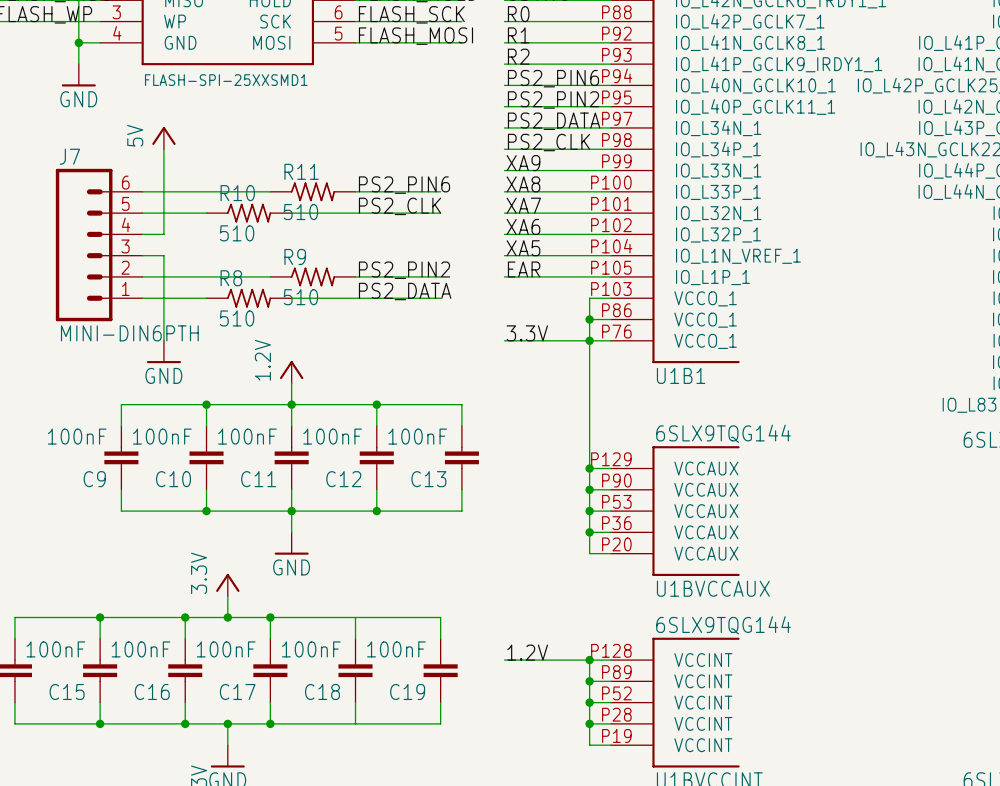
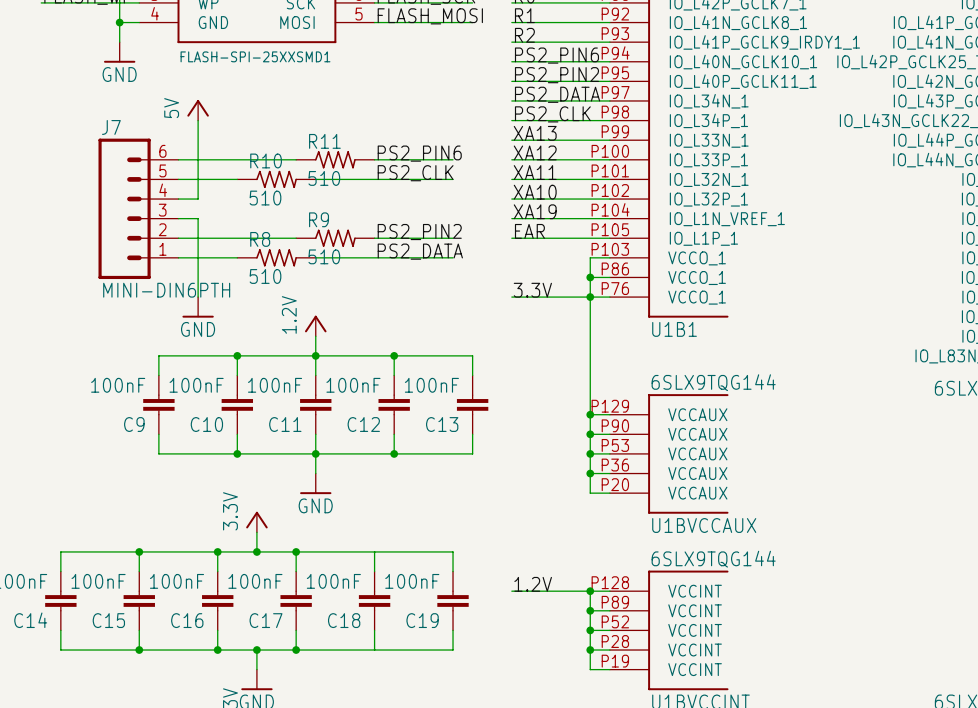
label: XA9 (523, 163) -> XA13 (535, 133)
label: XA8 (523, 184) -> XA12 (535, 152)
label: XA7 (523, 205) -> XA11 (535, 172)
label: XA6 (523, 226) -> XA10 (535, 192)
label: XA5 (523, 248) -> XA19 (535, 211)

